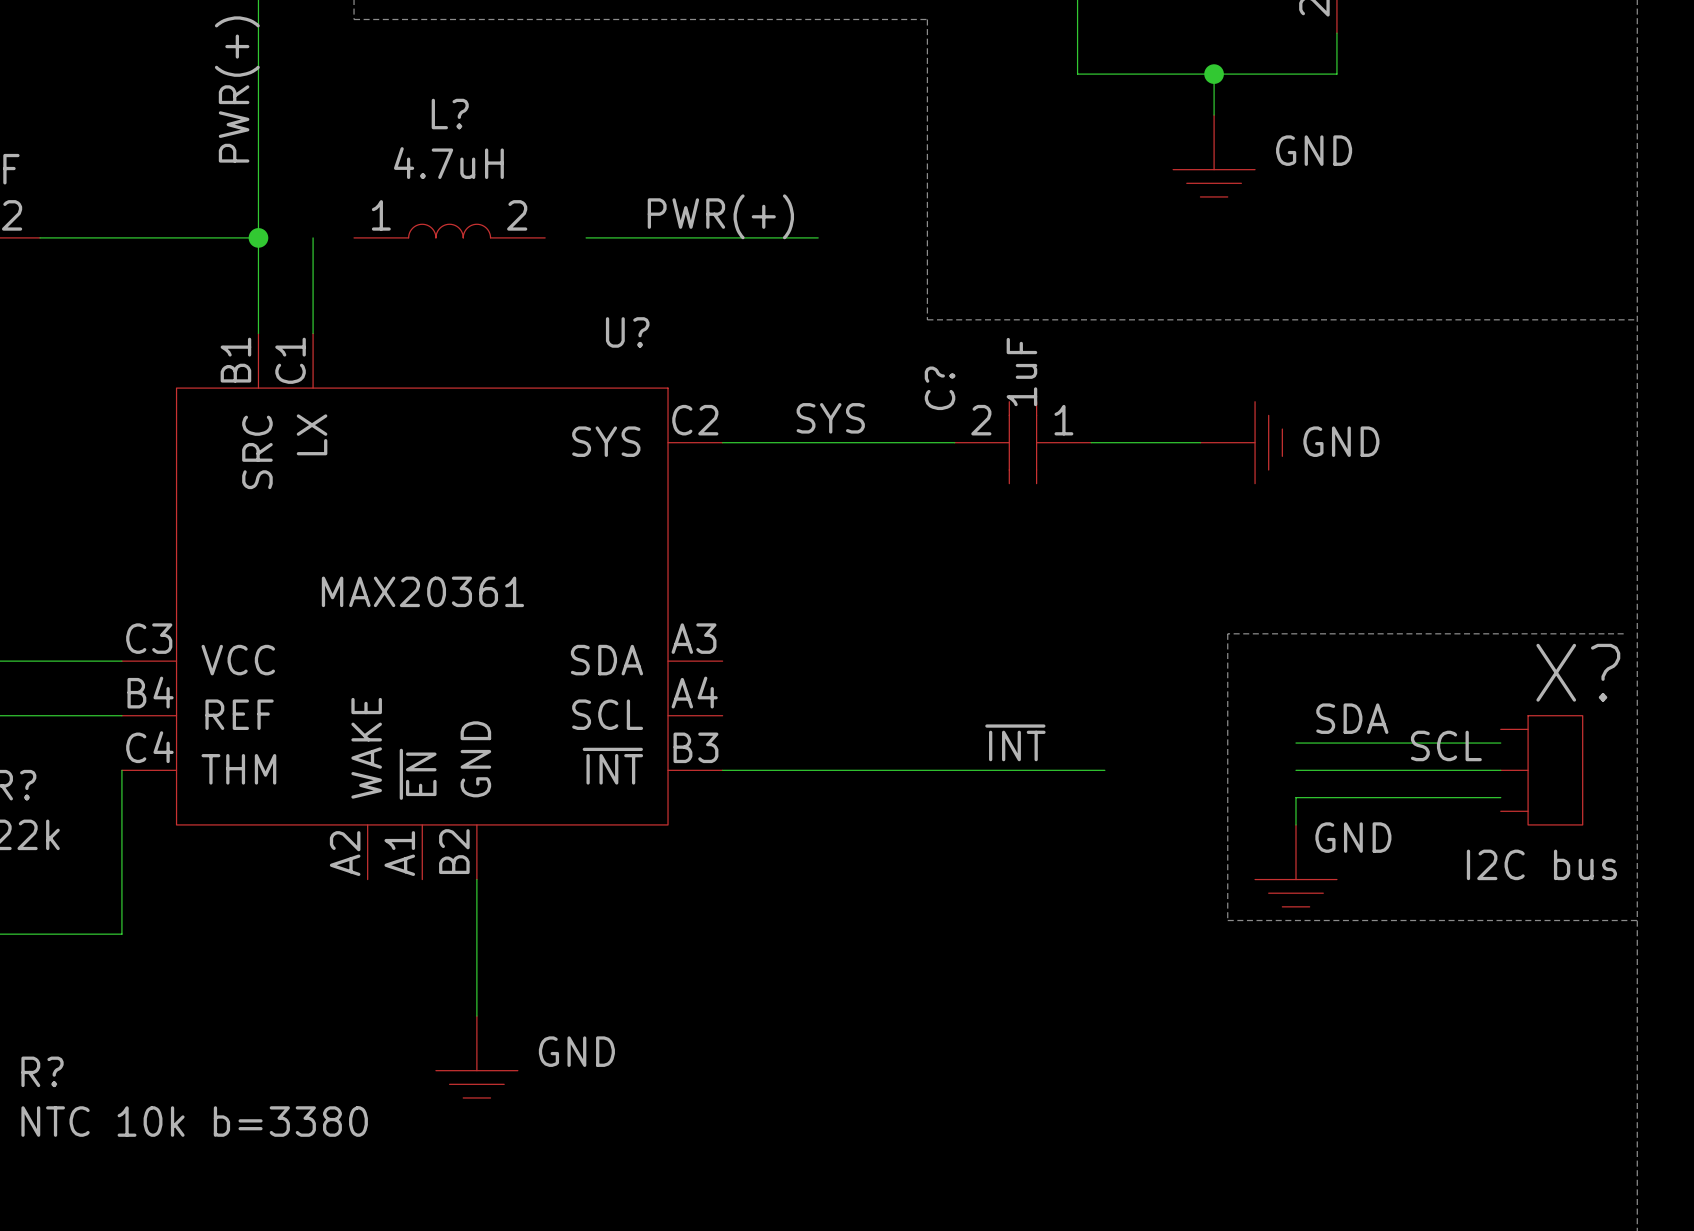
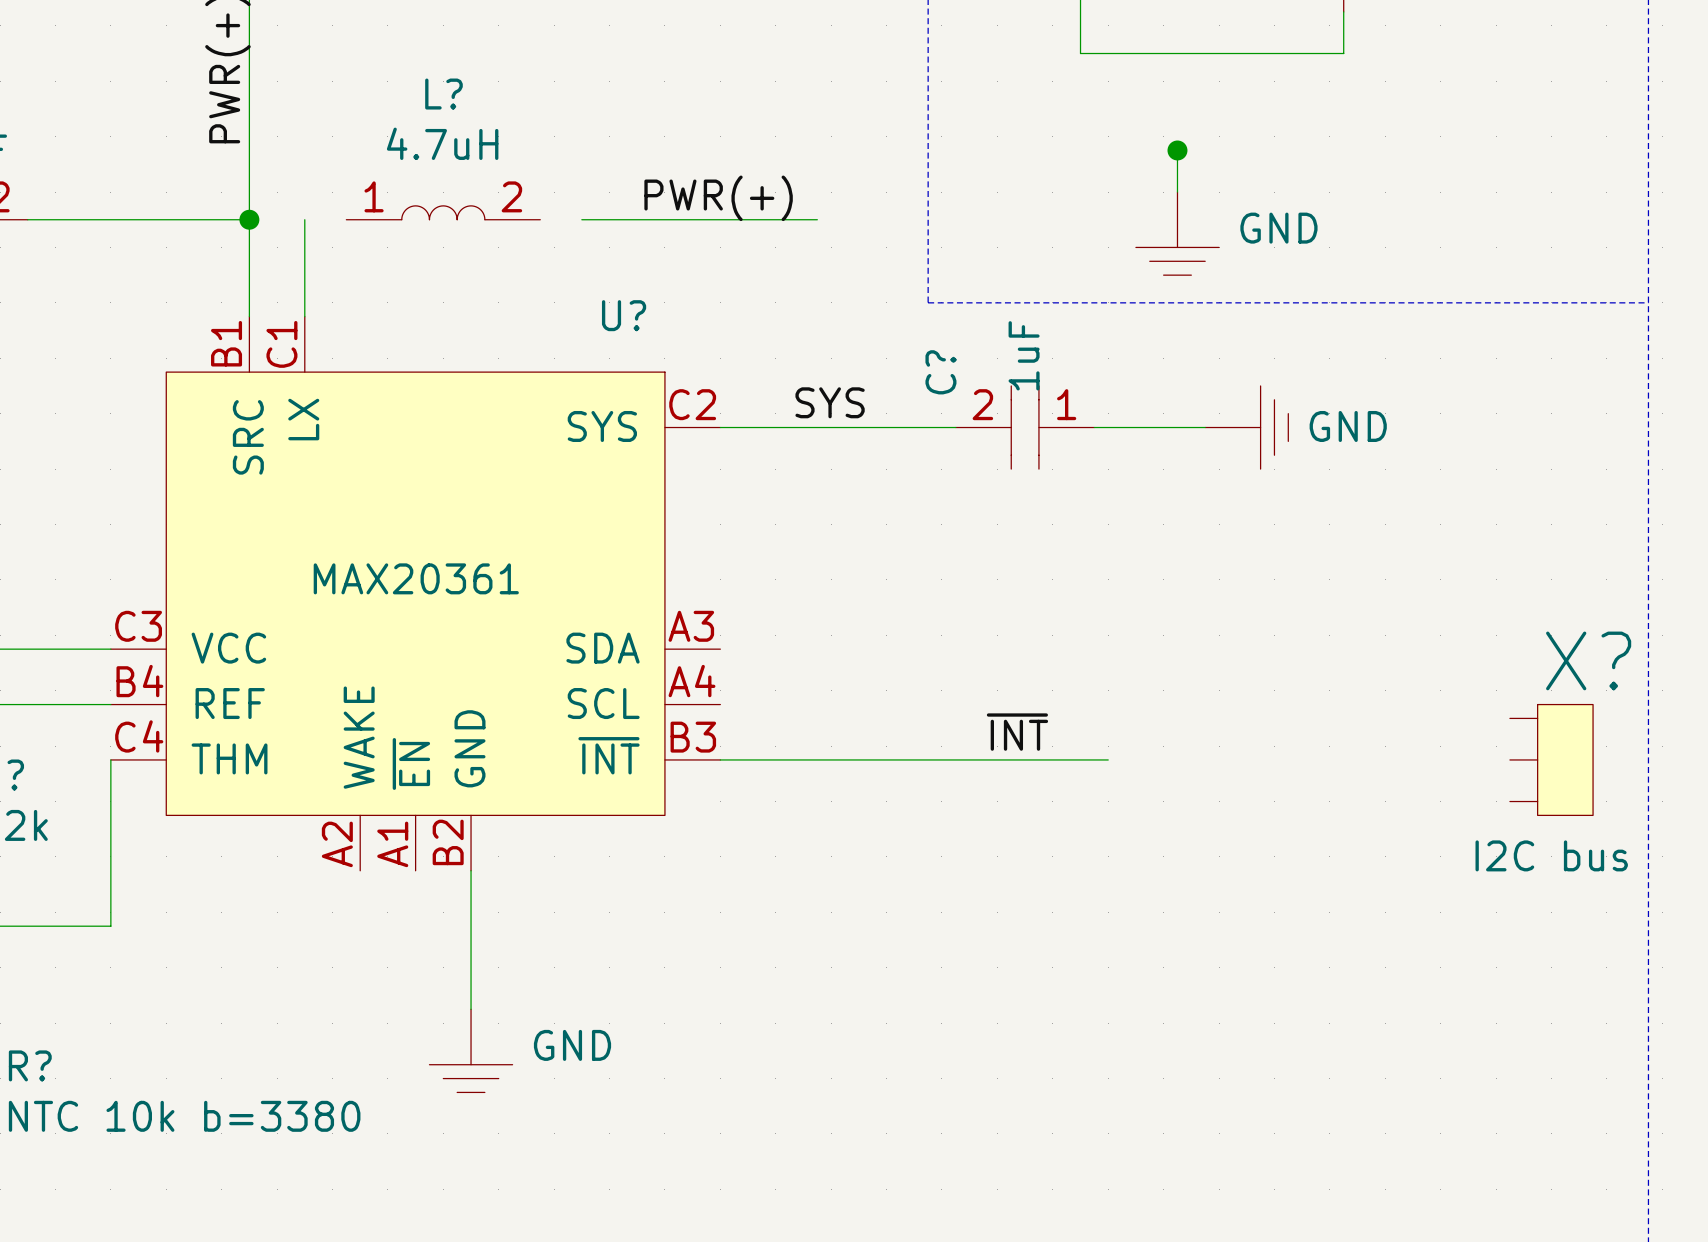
wire: (1214, 74) (1214, 115) -> (1177, 150) (1177, 192)
junction position: (1214, 74) -> (1177, 150)
part position: (1214, 156) -> (1177, 233)
line: (1623, 633) (1227, 633) (1227, 920) (1637, 920) -> none
label: SDA (1352, 718) -> none
wire: (1295, 743) (1500, 743) -> none
label: SCL (1446, 745) -> none
wire: (1295, 770) (1500, 770) -> none
wire: (1500, 797) (1295, 797) (1295, 824) -> none
part: GND (1295, 865) -> none

